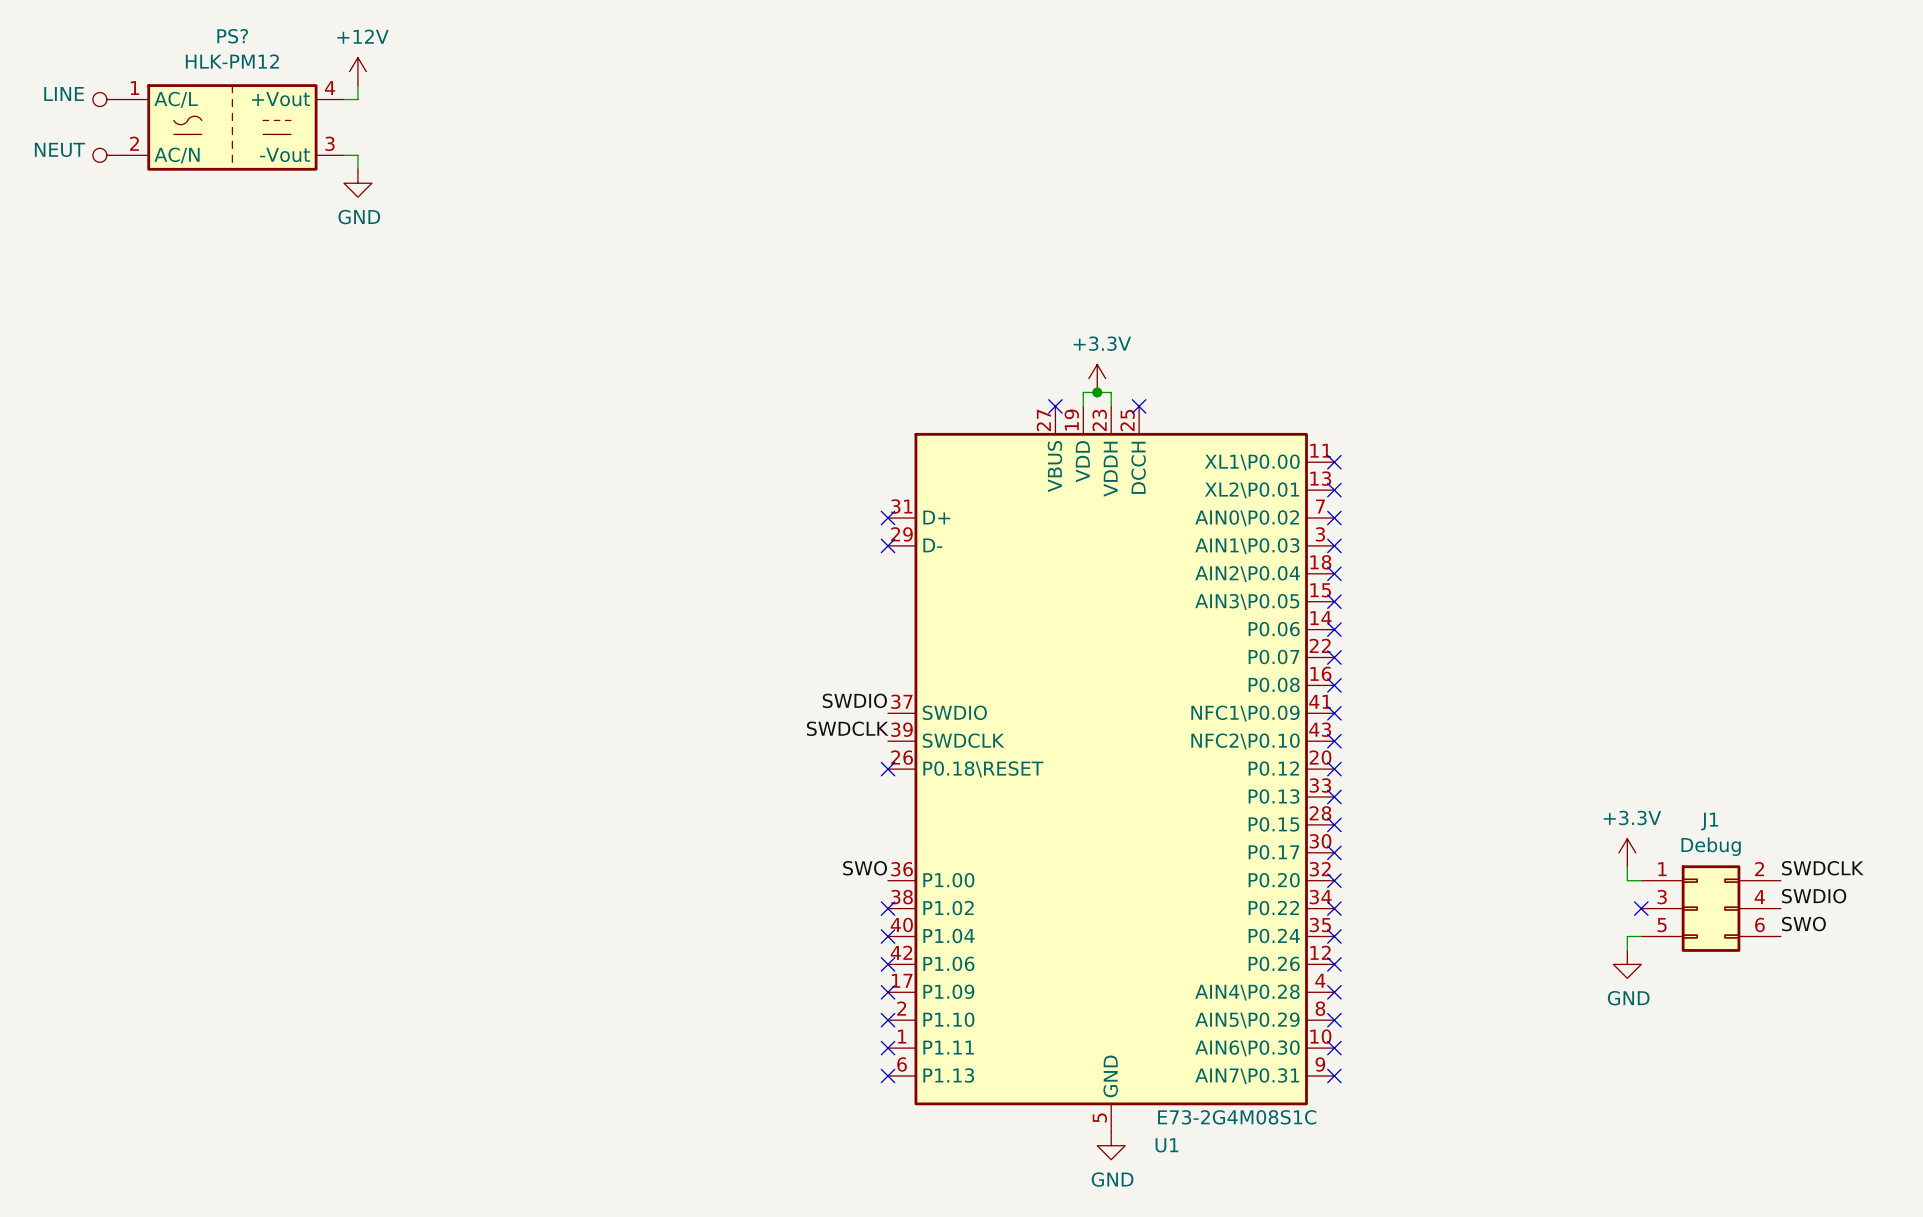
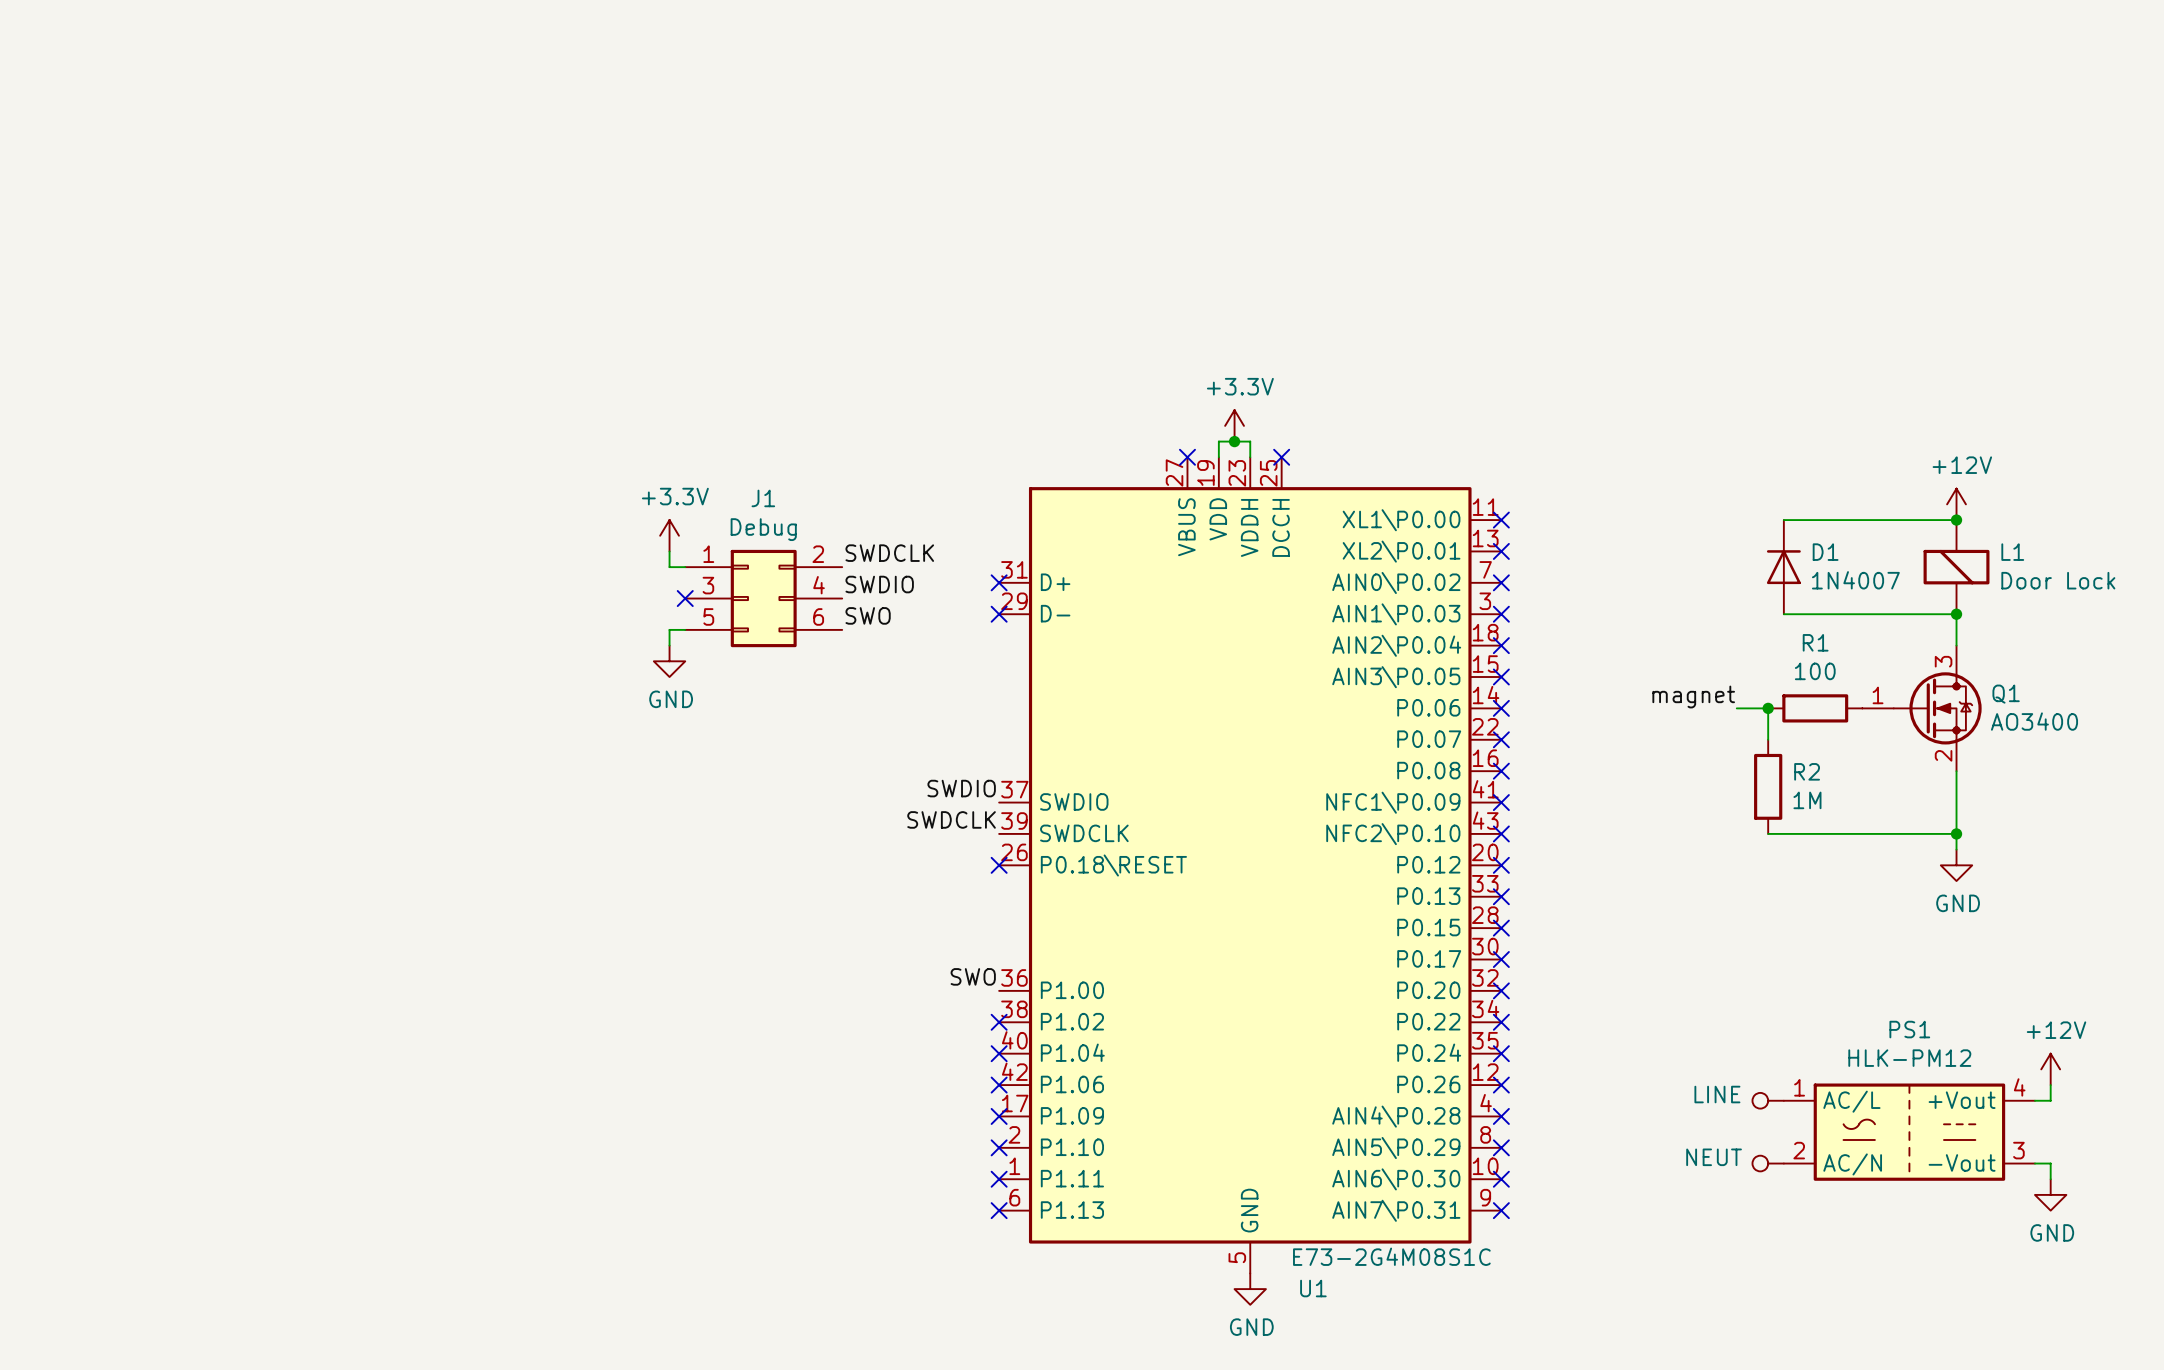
power symbol: +12V (357, 71) -> none
wire: (357, 85) (357, 99) (344, 99) -> none
power symbol: LINE (106, 99) -> none
PS?: HLK-PM12 (232, 127) -> none
power symbol: NEUT (106, 155) -> none
wire: (344, 155) (357, 155) (357, 169) -> none
power symbol: GND (357, 183) -> none
power symbol: none -> +12V (1956, 504)
wire: none -> (1783, 520) (1956, 520)
junction: none -> (1956, 520)
power symbol: none -> +3.3V (669, 535)
wire: none -> (669, 551) (669, 567) (685, 567)
label: none -> SWDCLK (889, 553)
D1: none -> 1N4007 (1783, 567)
L1: none -> Door Lock (1956, 567)
label: none -> SWDIO (879, 584)
no-connect mark: none -> (685, 598)
wire: none -> (1783, 614) (1956, 614) (1956, 645)
junction: none -> (1956, 614)
label: none -> SWO (868, 615)
wire: none -> (685, 629) (669, 629) (669, 645)
power symbol: none -> GND (669, 661)
label: none -> magnet (1693, 697)
wire: none -> (1736, 708) (1768, 708) (1768, 739)
junction: none -> (1768, 708)
R1: none -> 100 (1815, 708)
Q1: none -> AO3400 (1921, 708)
wire: none -> (1956, 771) (1956, 849)
R2: none -> 1M (1768, 786)
wire: none -> (1768, 833) (1956, 833)
junction: none -> (1956, 833)
power symbol: none -> GND (1956, 865)
power symbol: +3.3V (1627, 852) -> none
wire: (1627, 866) (1627, 880) (1641, 880) -> none
label: SWDCLK (1822, 868) -> none
label: SWDIO (1814, 896) -> none
no-connect mark: (1641, 908) -> none
J1 position: (1711, 908) -> (763, 598)
label: SWO (1803, 924) -> none
wire: (1641, 936) (1627, 936) (1627, 950) -> none
power symbol: none -> +12V (2050, 1069)
power symbol: GND (1627, 964) -> none
wire: none -> (2050, 1085) (2050, 1100) (2034, 1100)
power symbol: none -> LINE (1768, 1100)
PS1: none -> HLK-PM12 (1909, 1132)
power symbol: none -> NEUT (1768, 1163)
wire: none -> (2034, 1163) (2050, 1163) (2050, 1179)
power symbol: none -> GND (2050, 1194)

